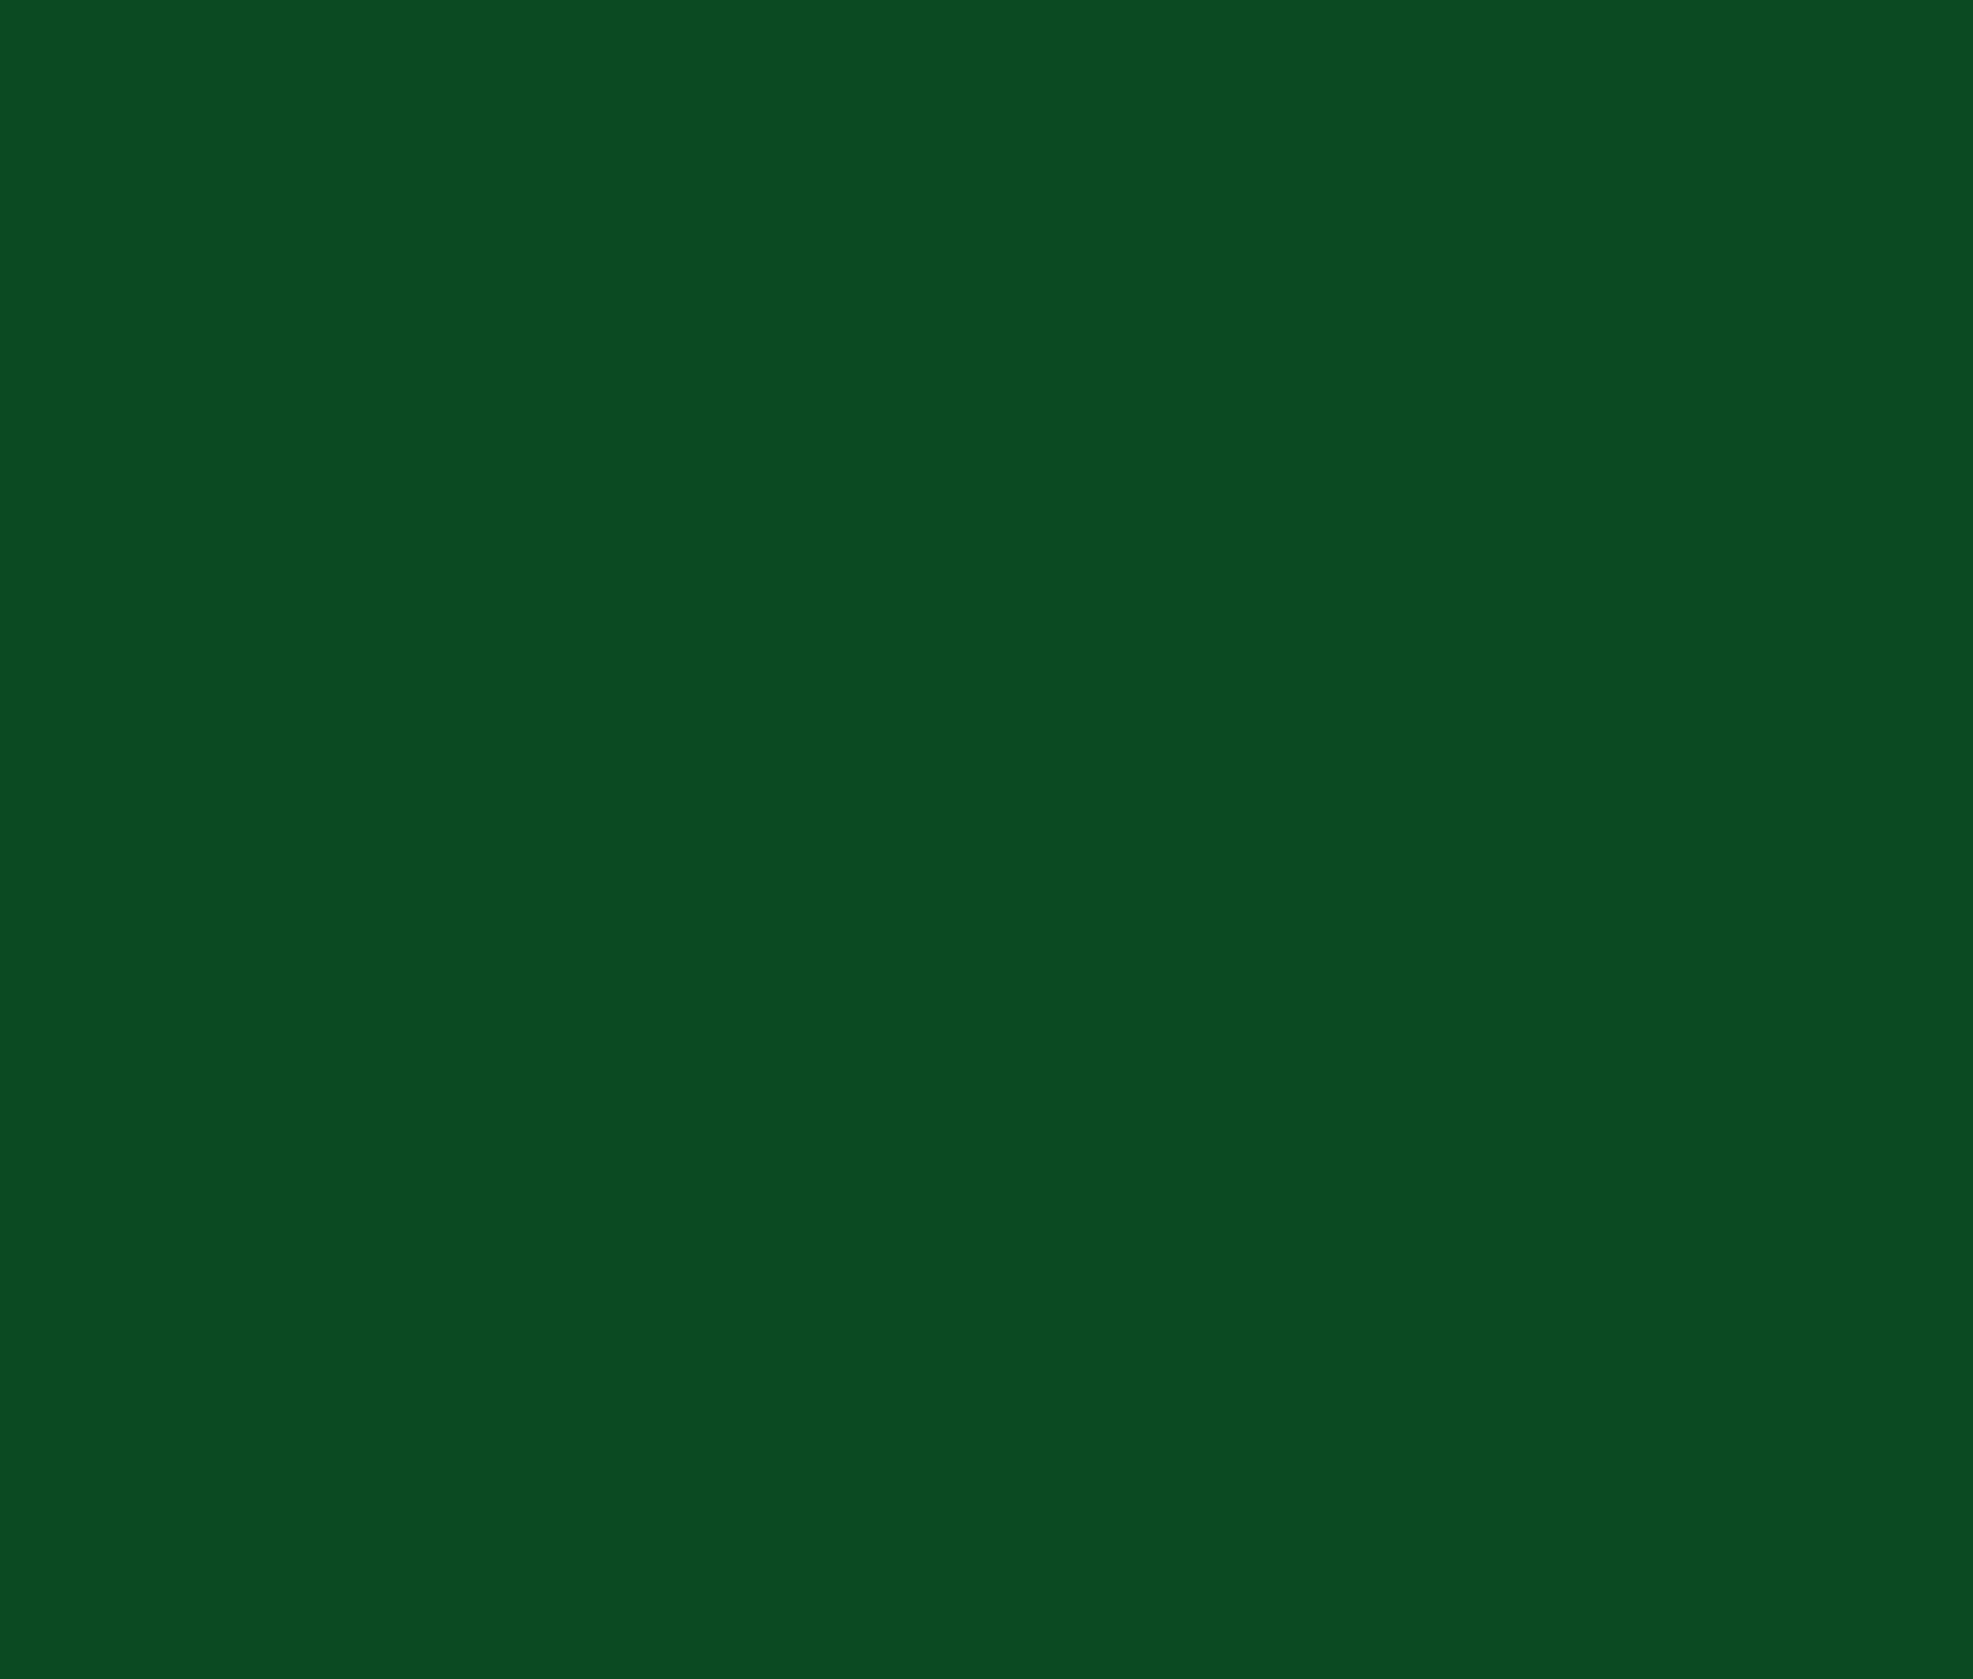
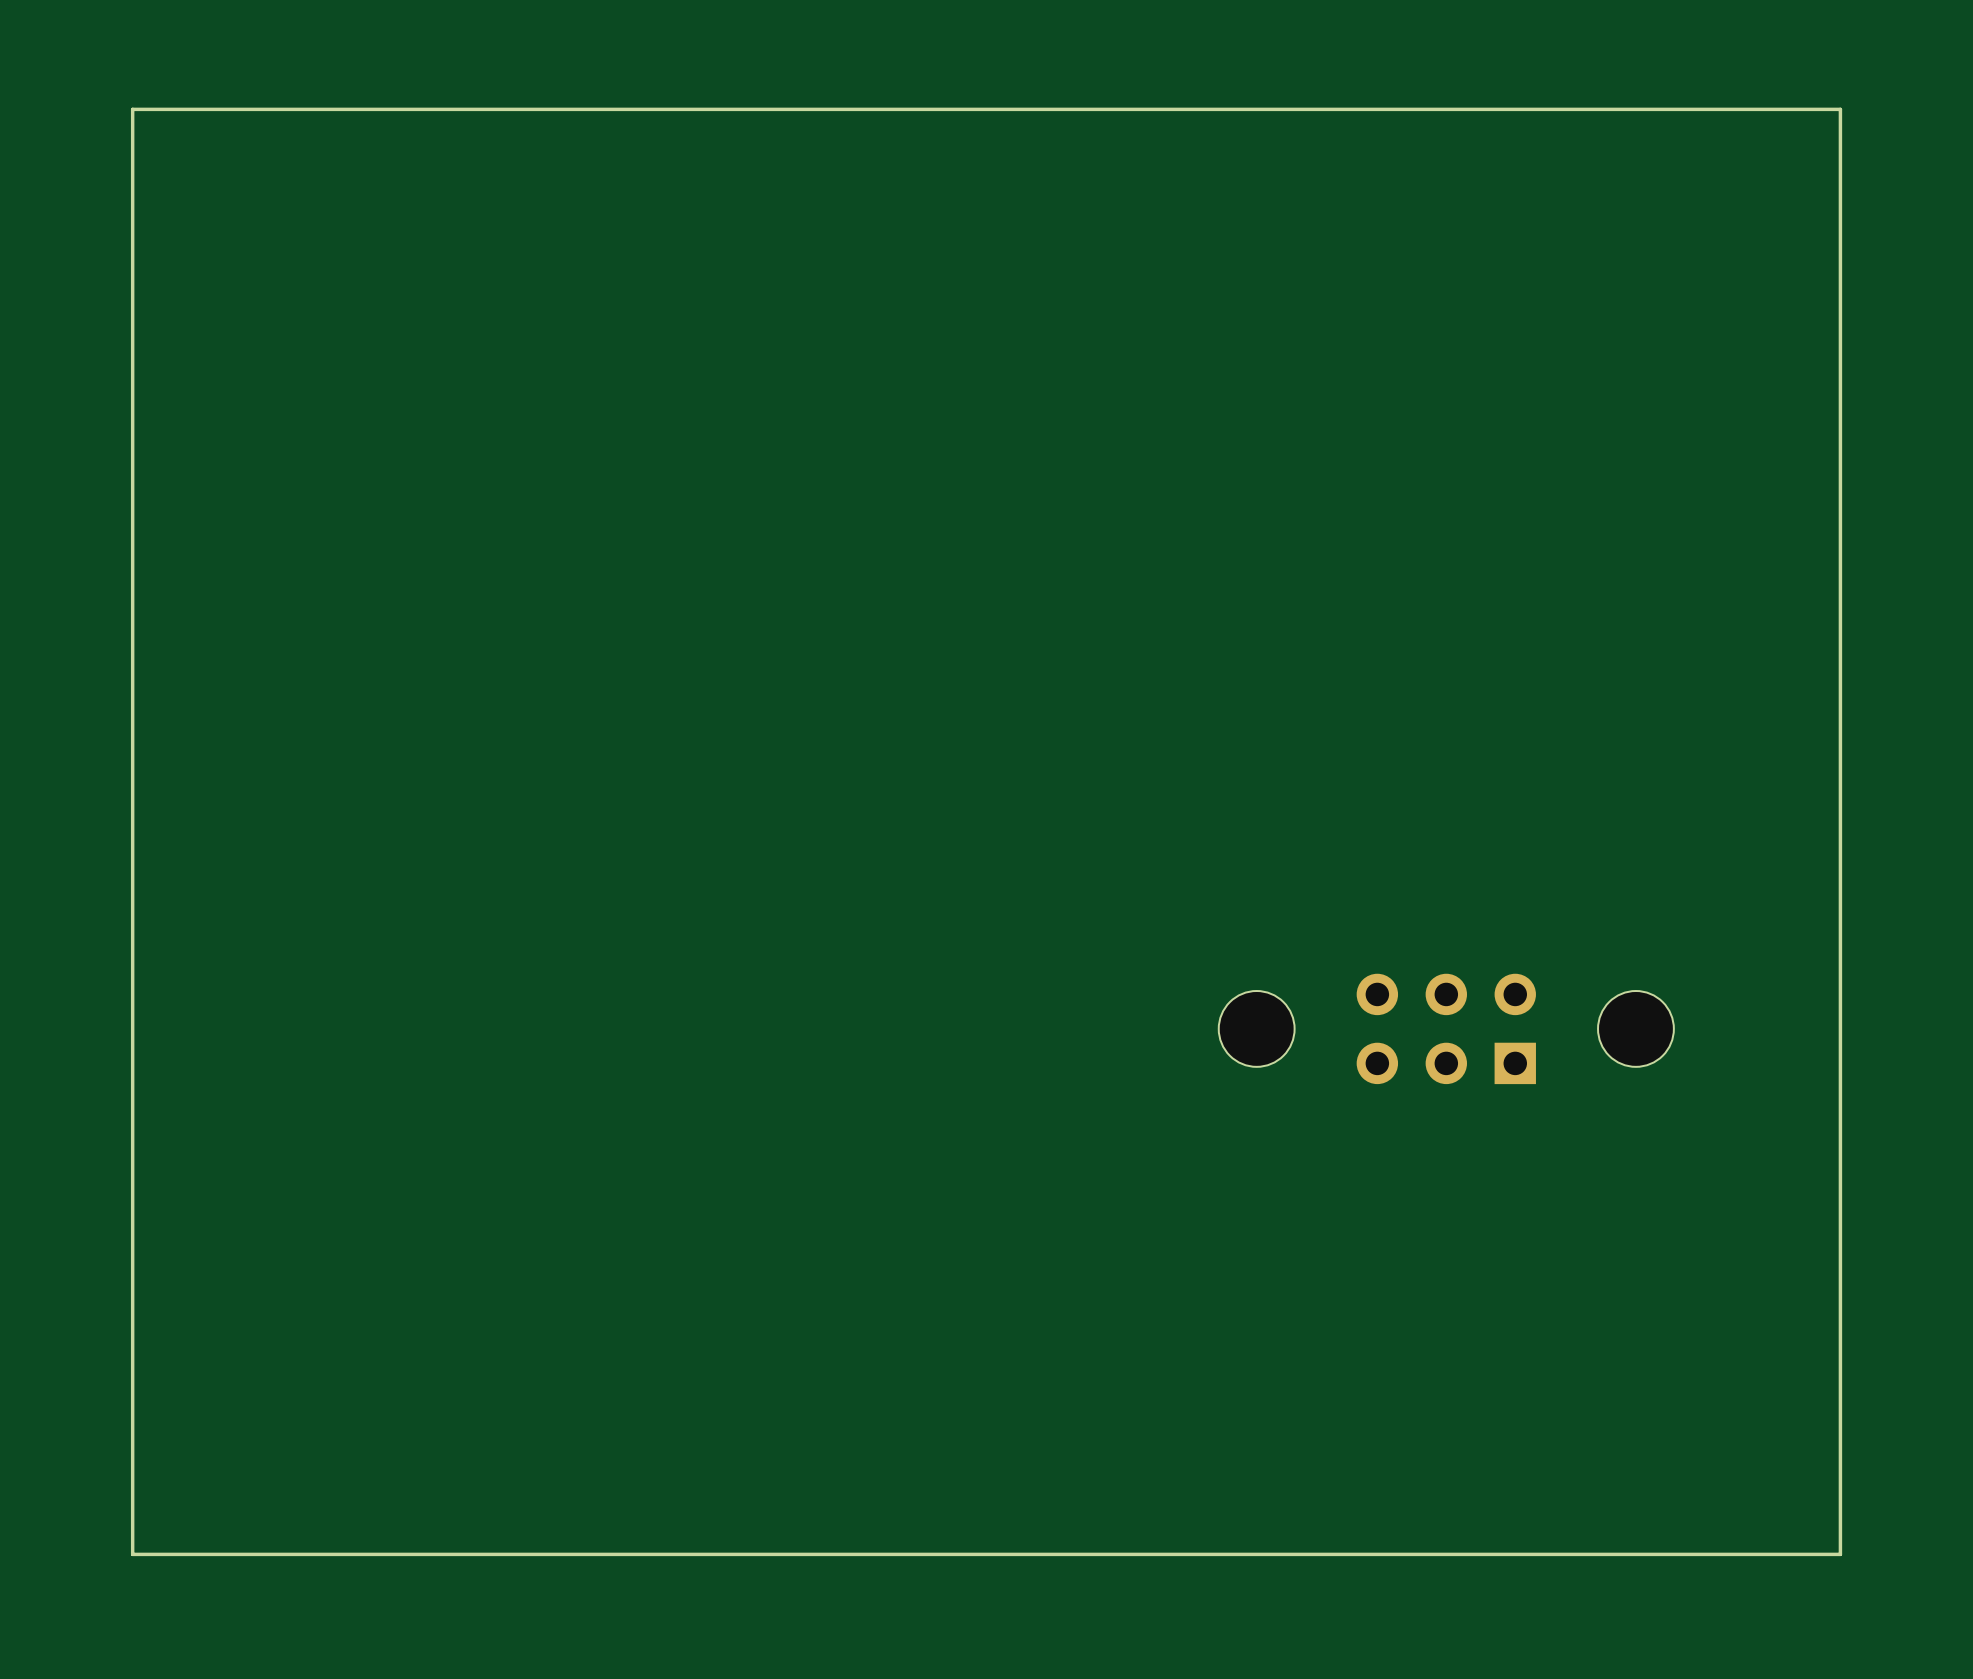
board edge: none -> (1840, 109) (1840, 1554) (132, 1554) (132, 109) (1840, 109)
part: none -> (1446, 1028)

